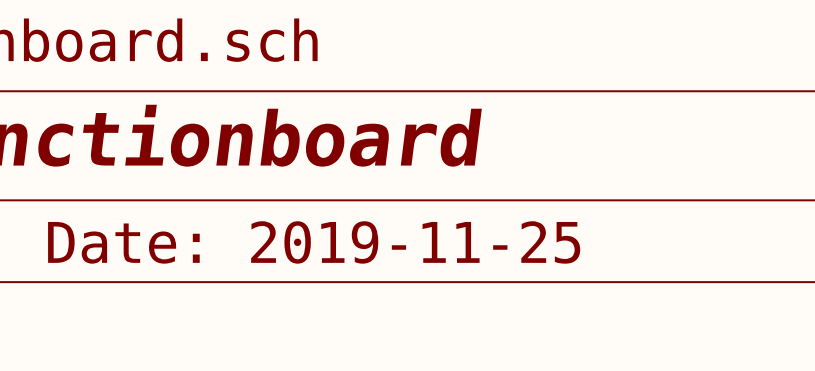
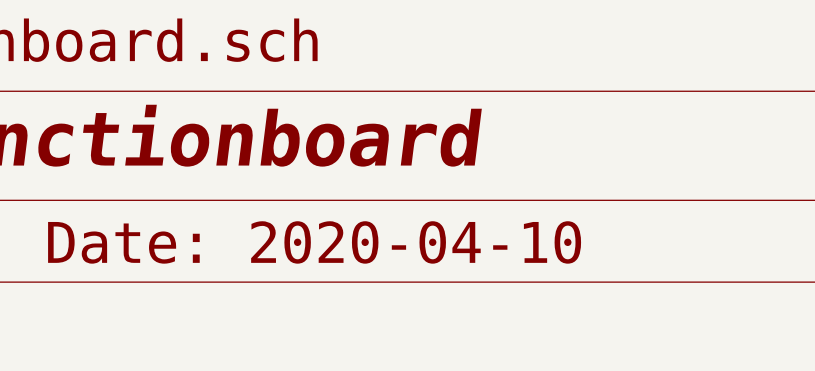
title block: Date: 2019-11-25 (314, 242) -> Date: 2020-04-10 (314, 242)

